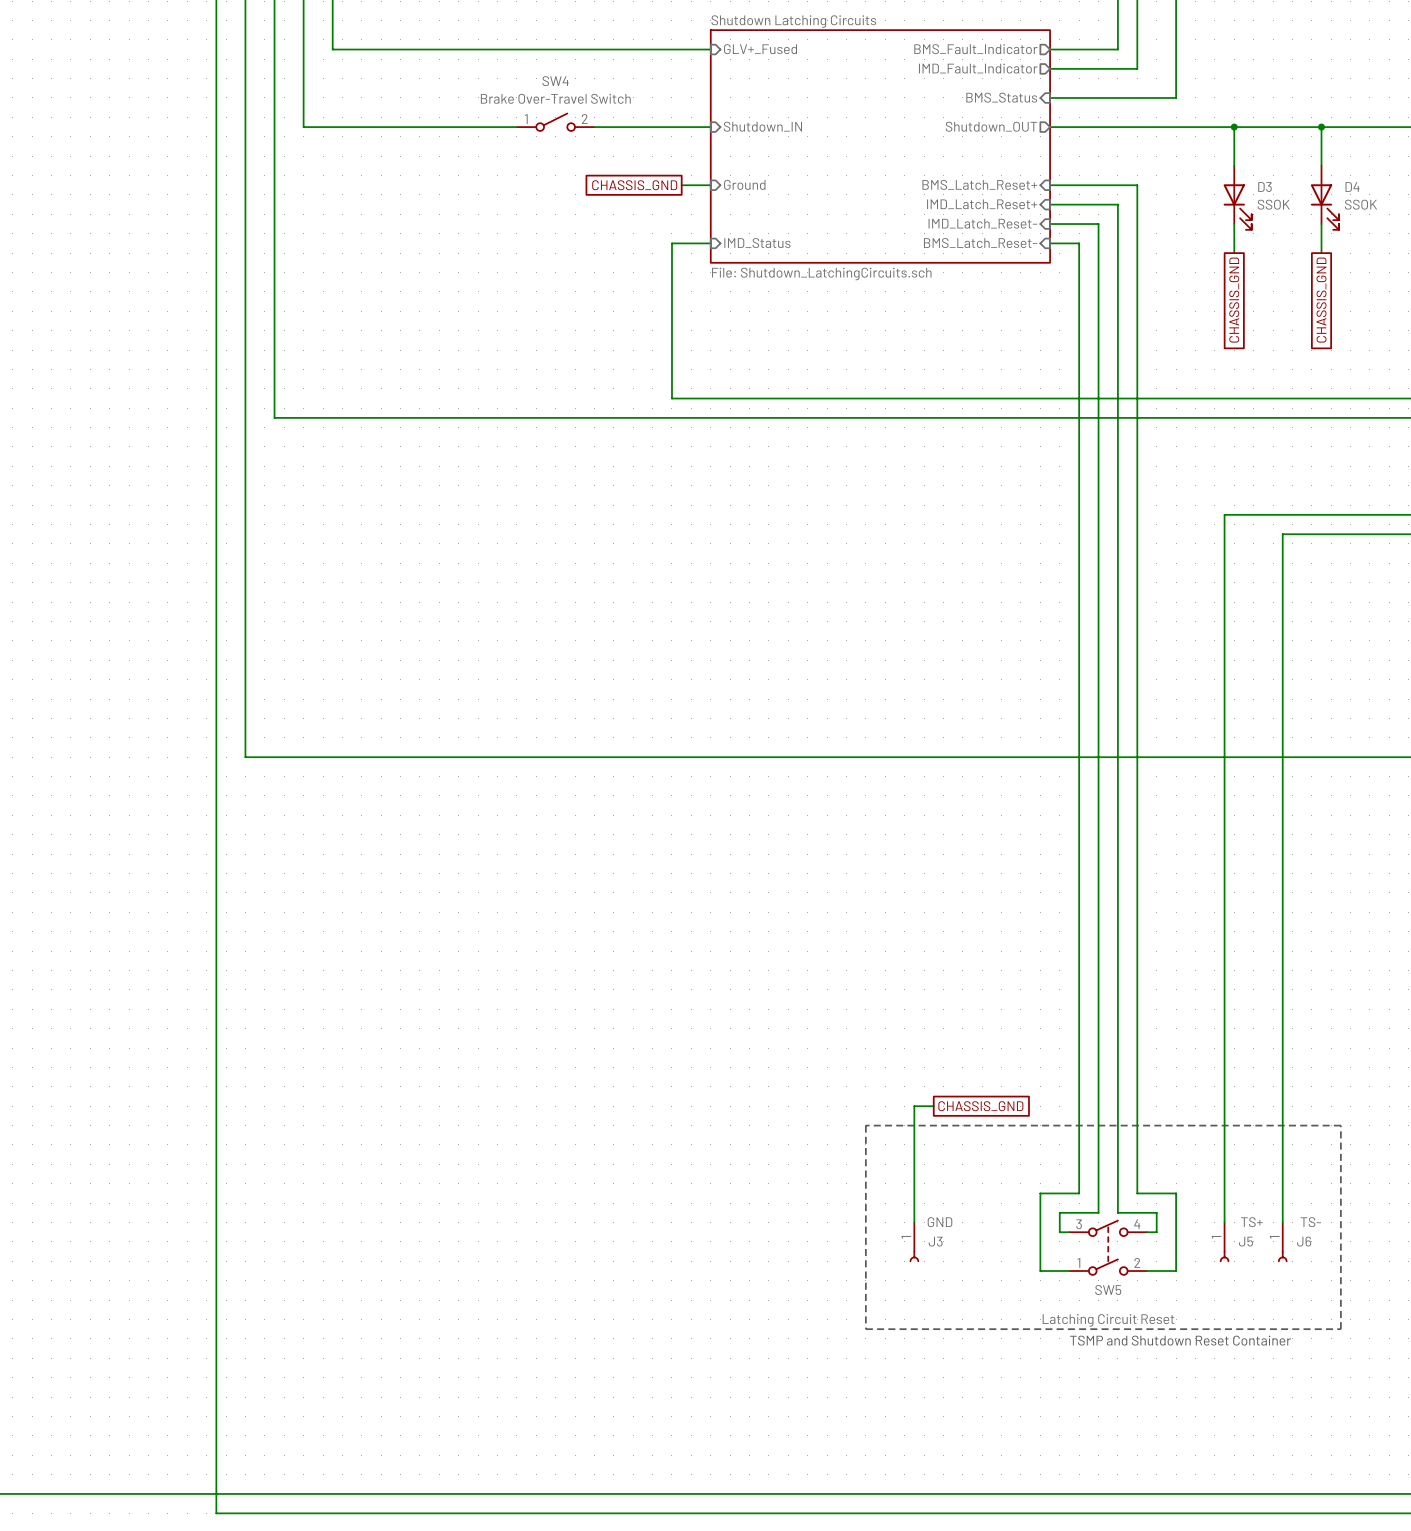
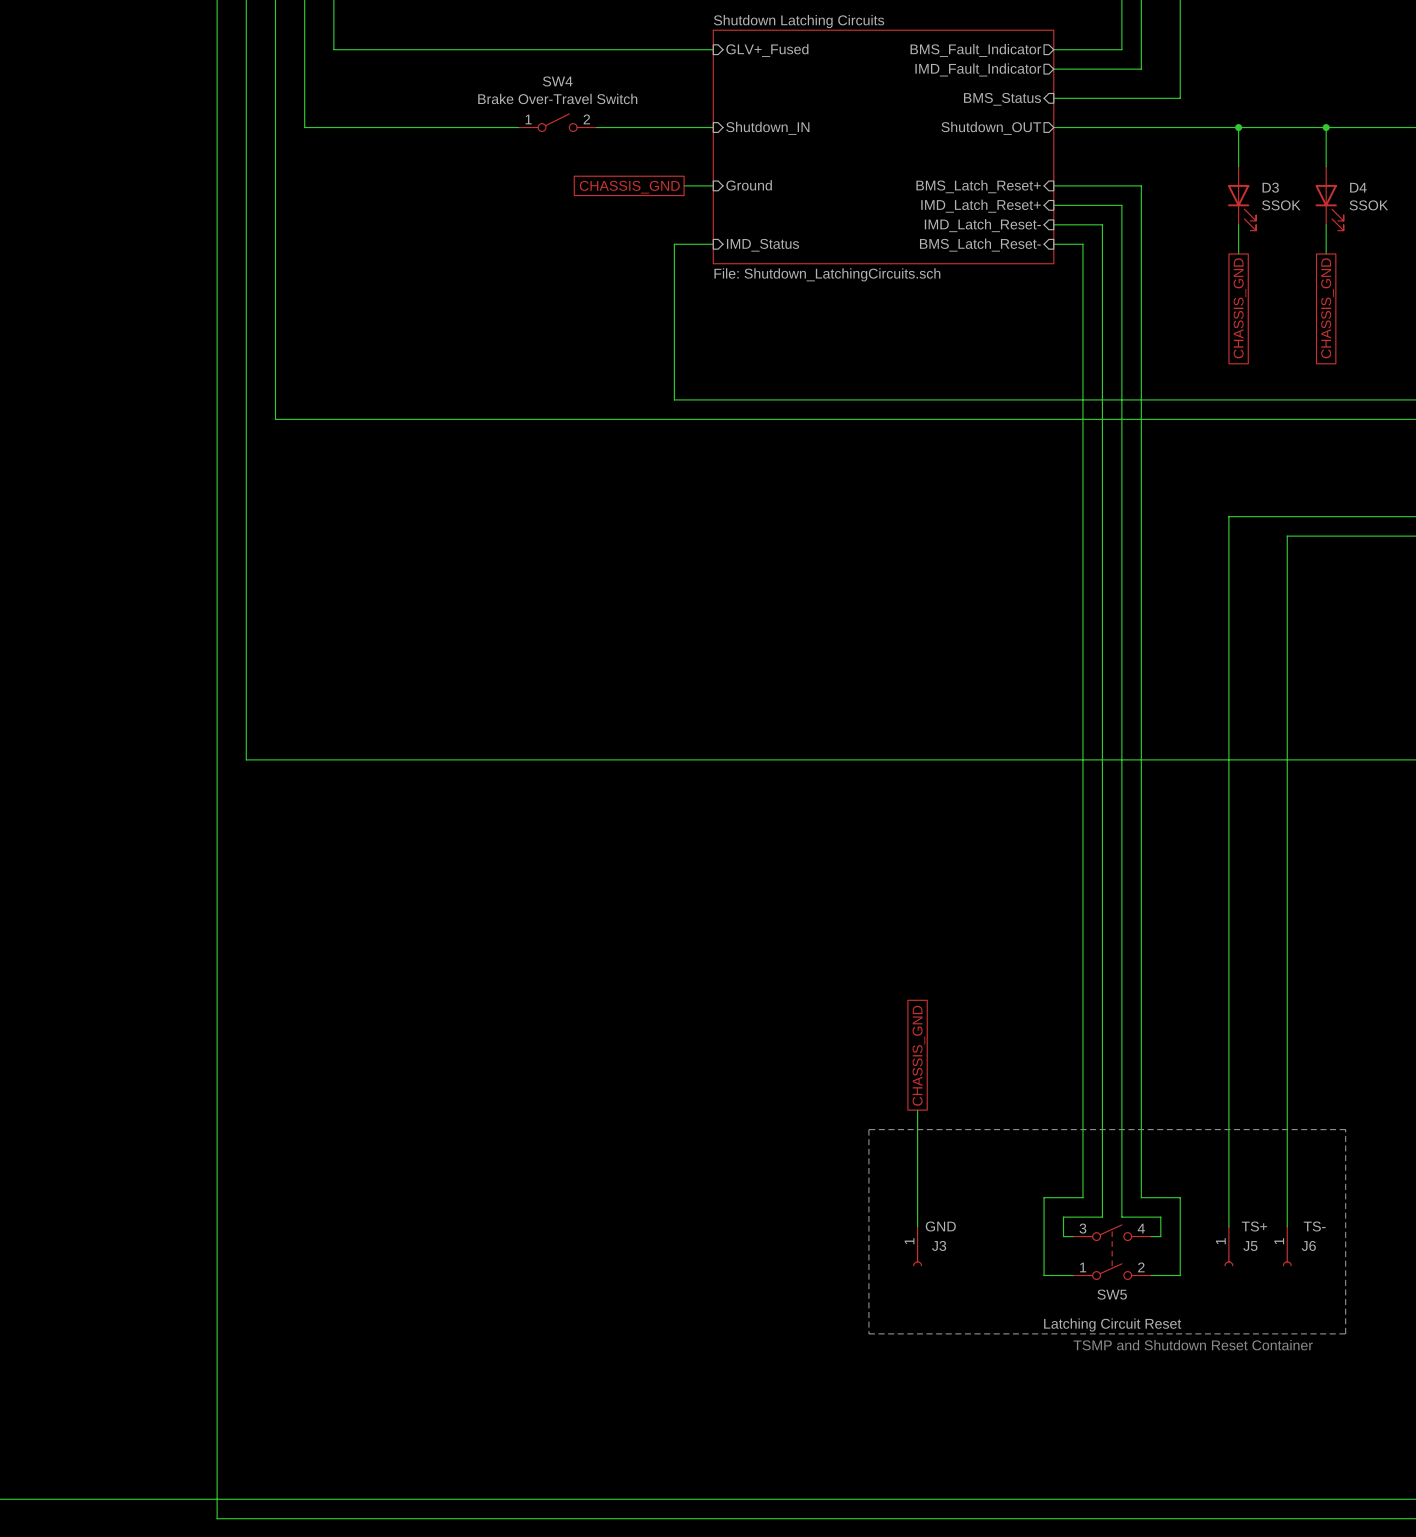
wire: (914, 1106) (933, 1106) -> none
global label rotation: 0° (980, 1106) -> 90° counterclockwise (918, 1055)

